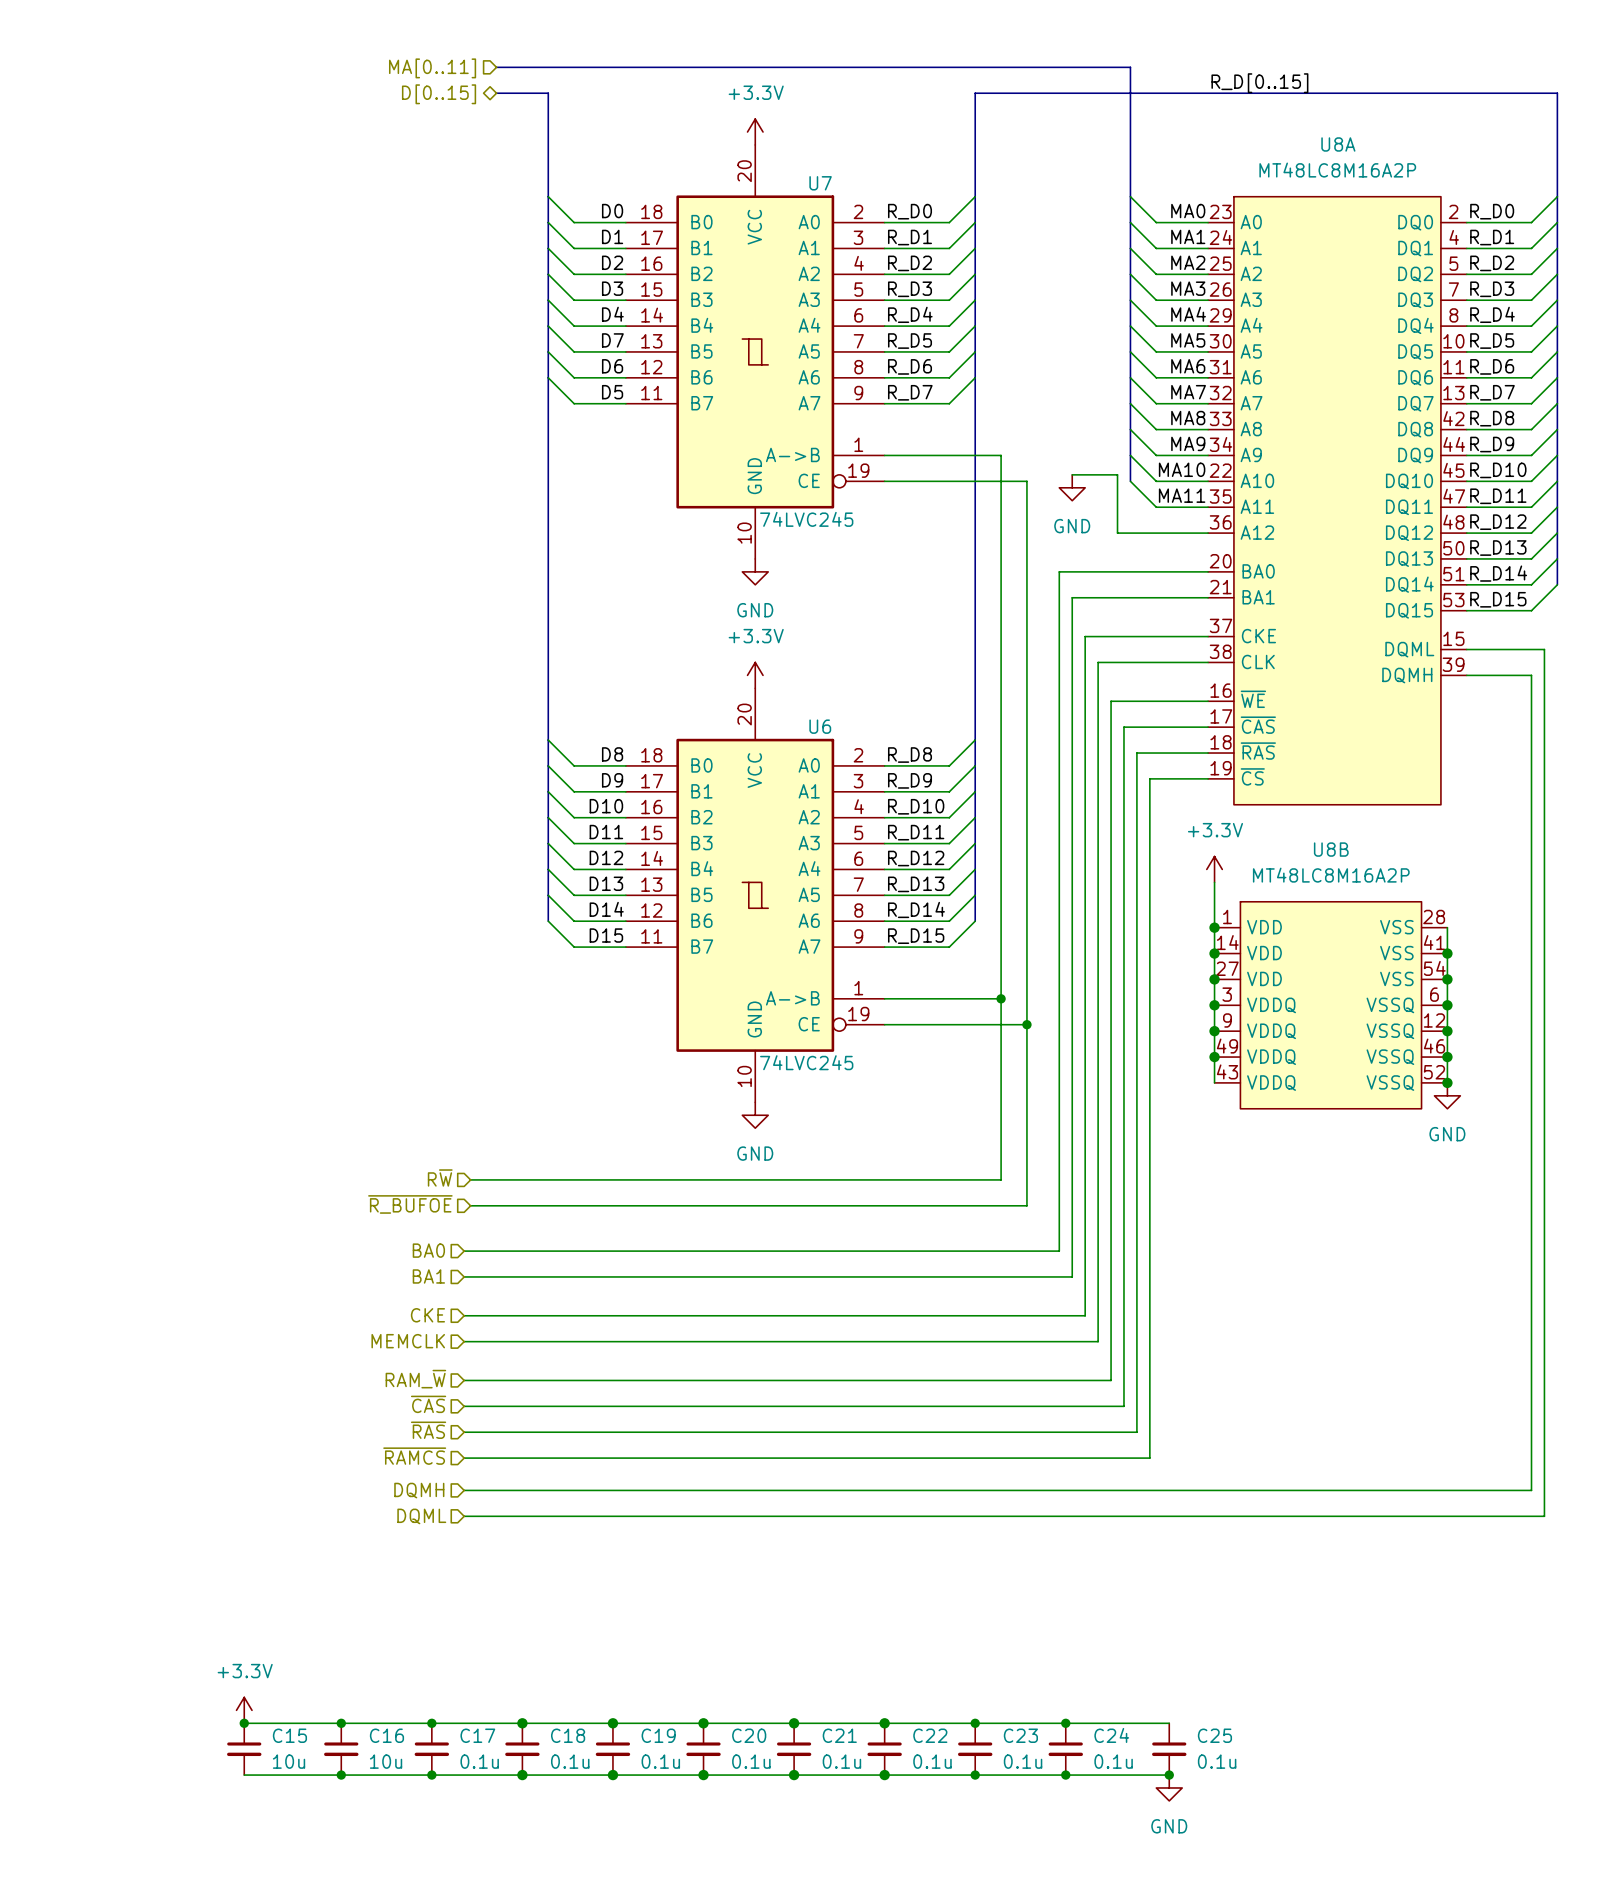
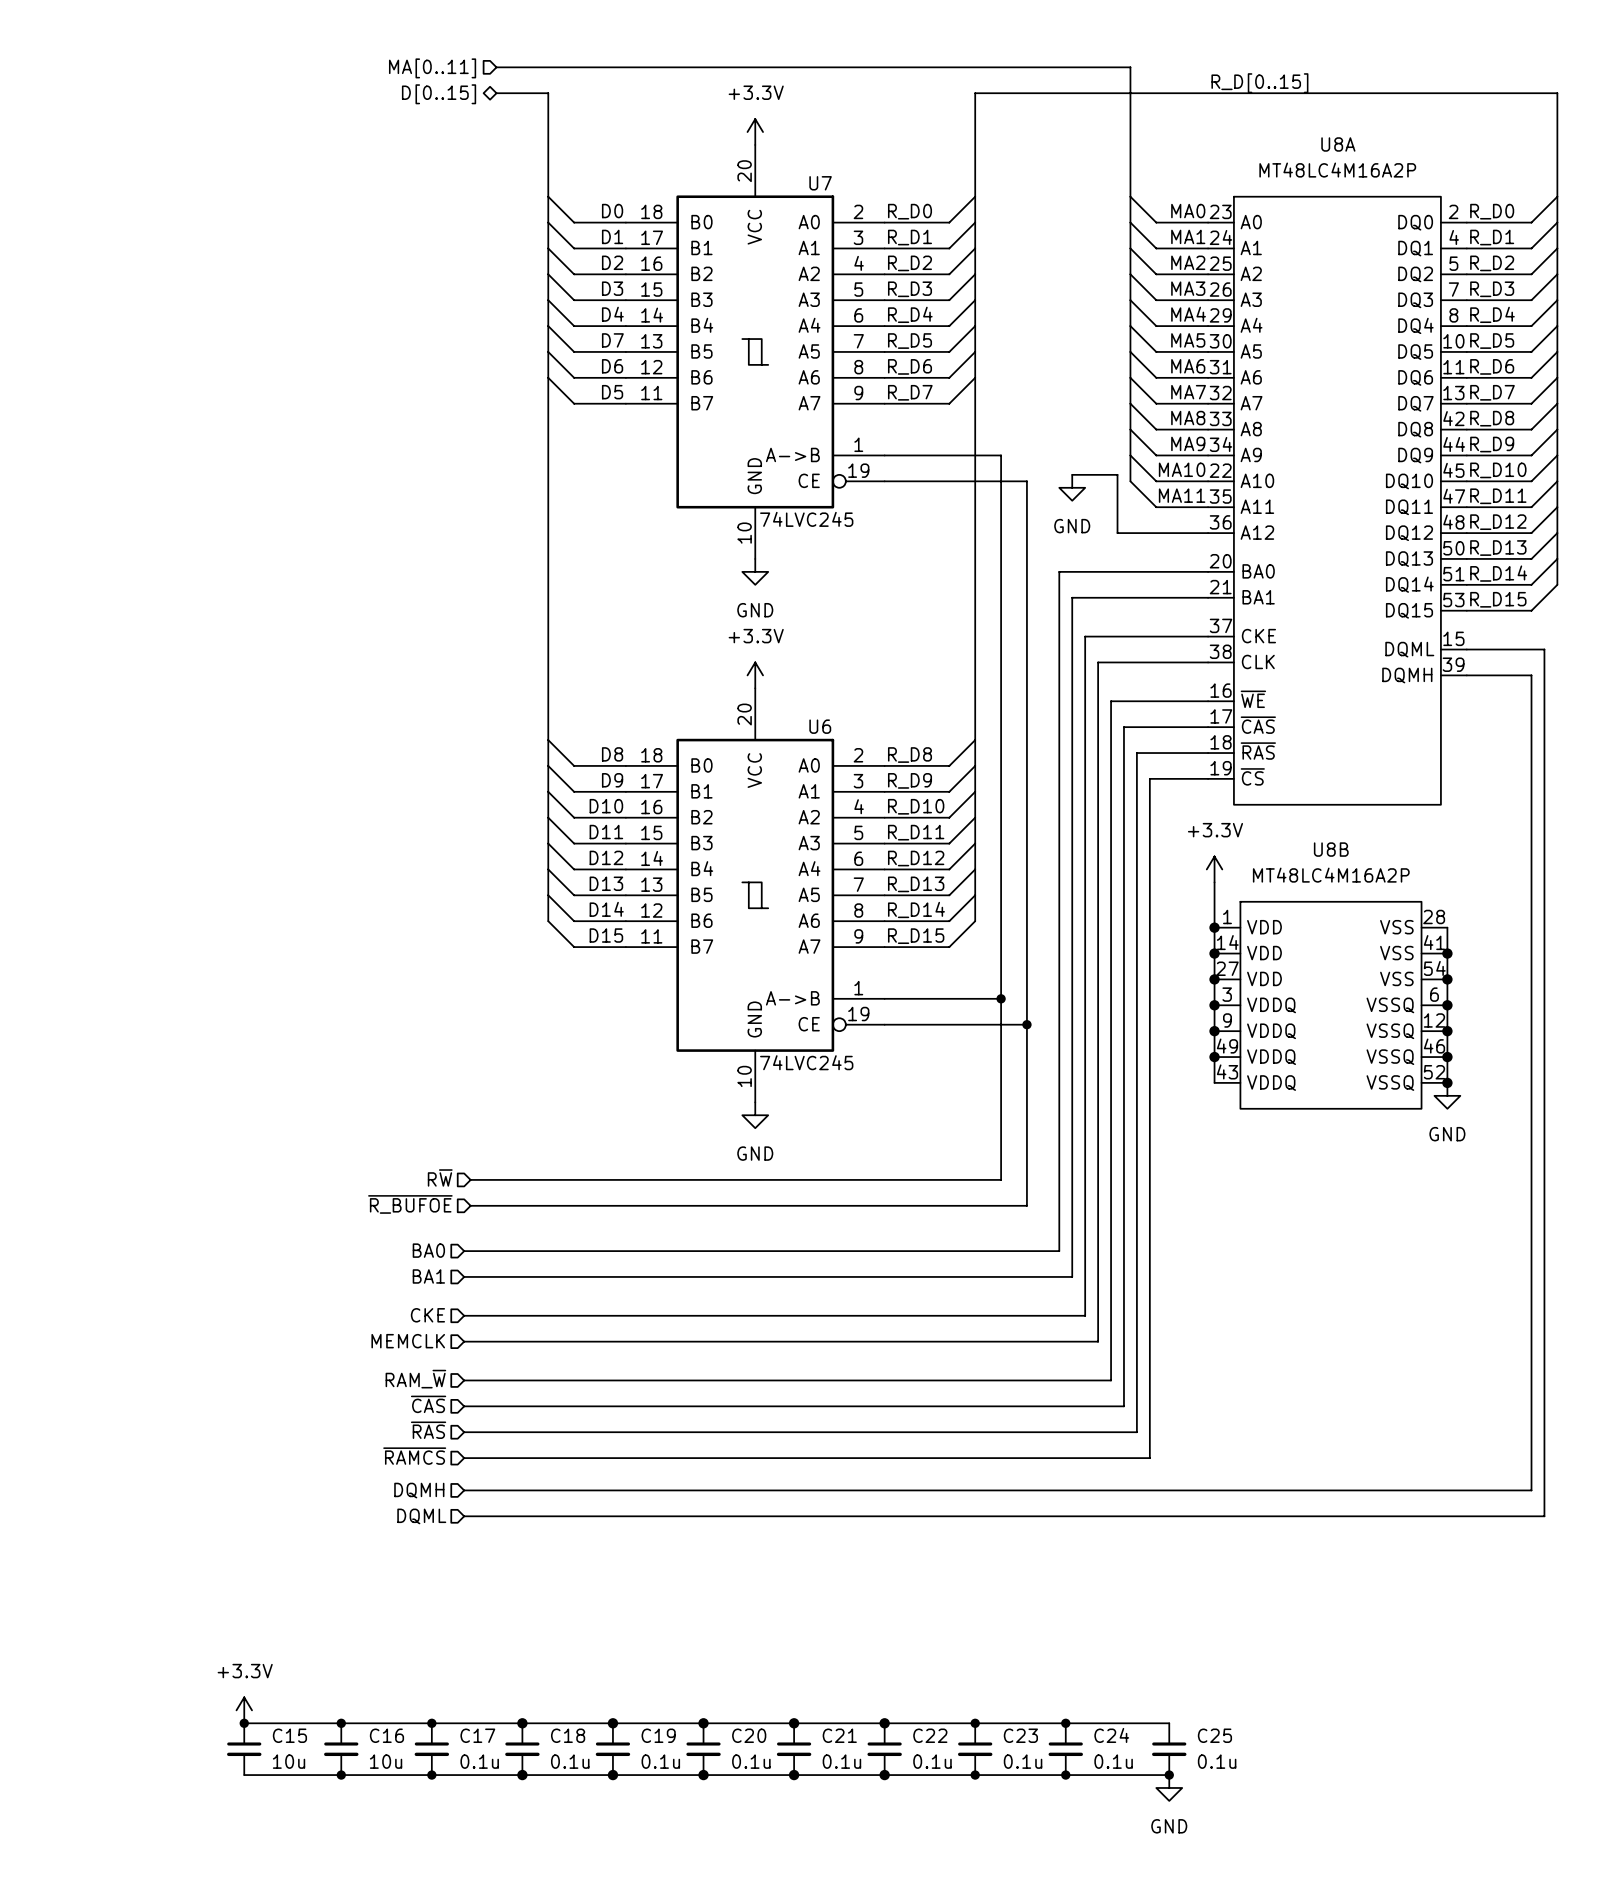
U8A value: MT48LC8M16A2P (1337, 170) -> MT48LC4M16A2P (1337, 170)
U8B value: MT48LC8M16A2P (1331, 875) -> MT48LC4M16A2P (1331, 875)

